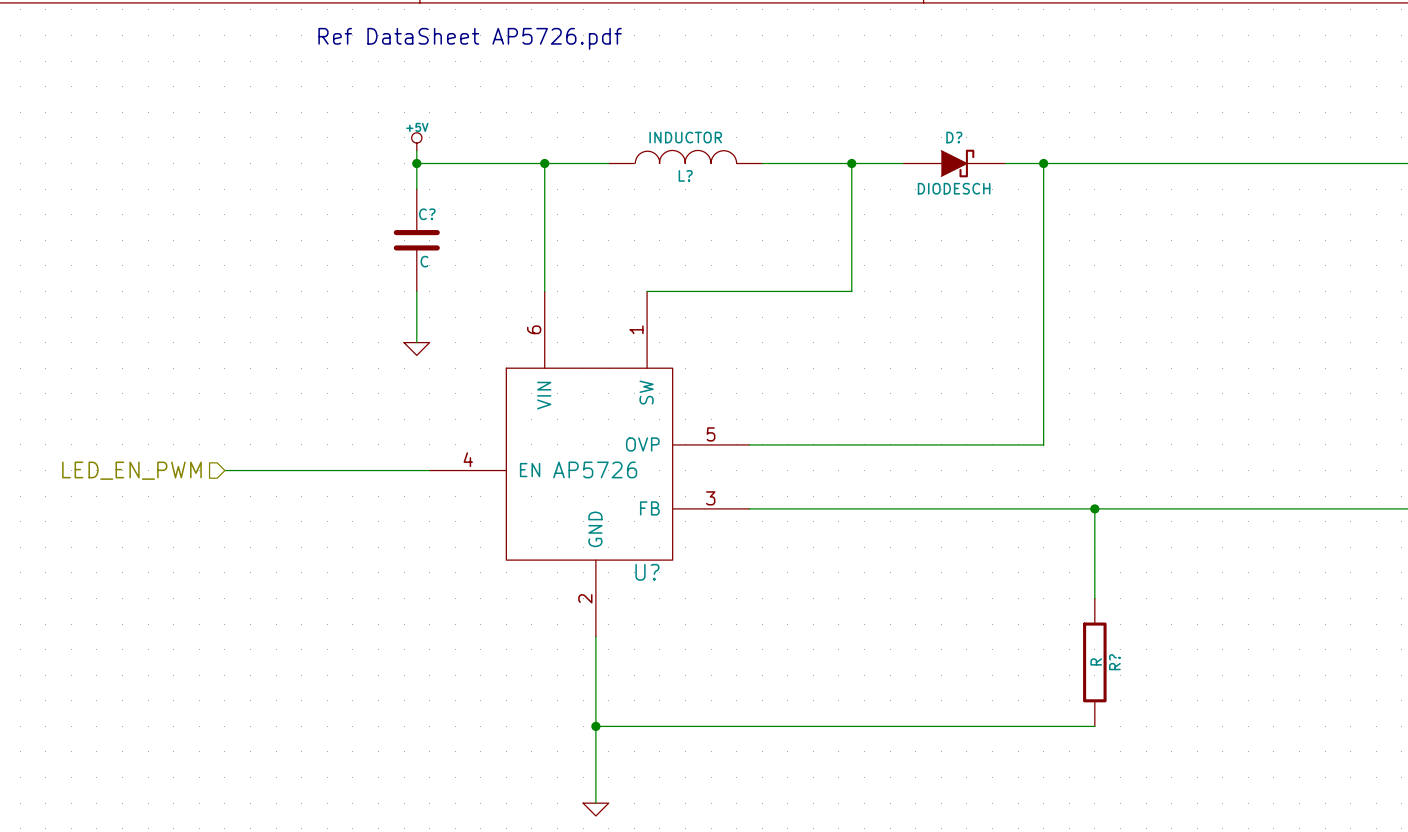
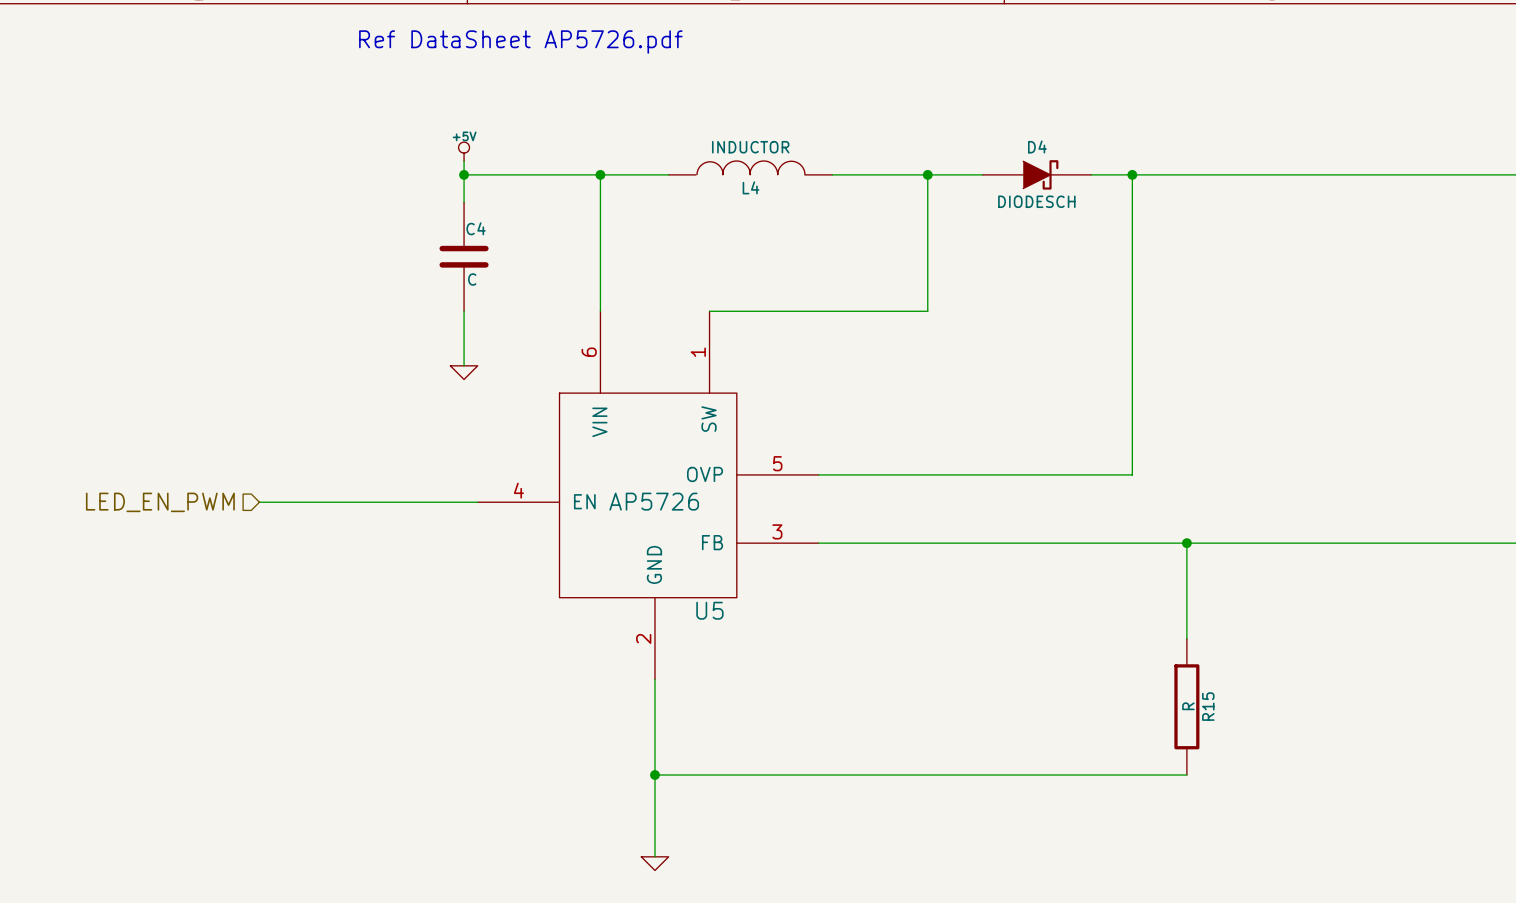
D? name: D? (954, 137) -> D4 (1037, 146)
L? name: L? (685, 175) -> L4 (750, 187)
C? name: C? (427, 214) -> C4 (476, 228)
U? name: U? (647, 572) -> U5 (709, 610)
R? name: R? (1114, 662) -> R15 (1208, 706)

